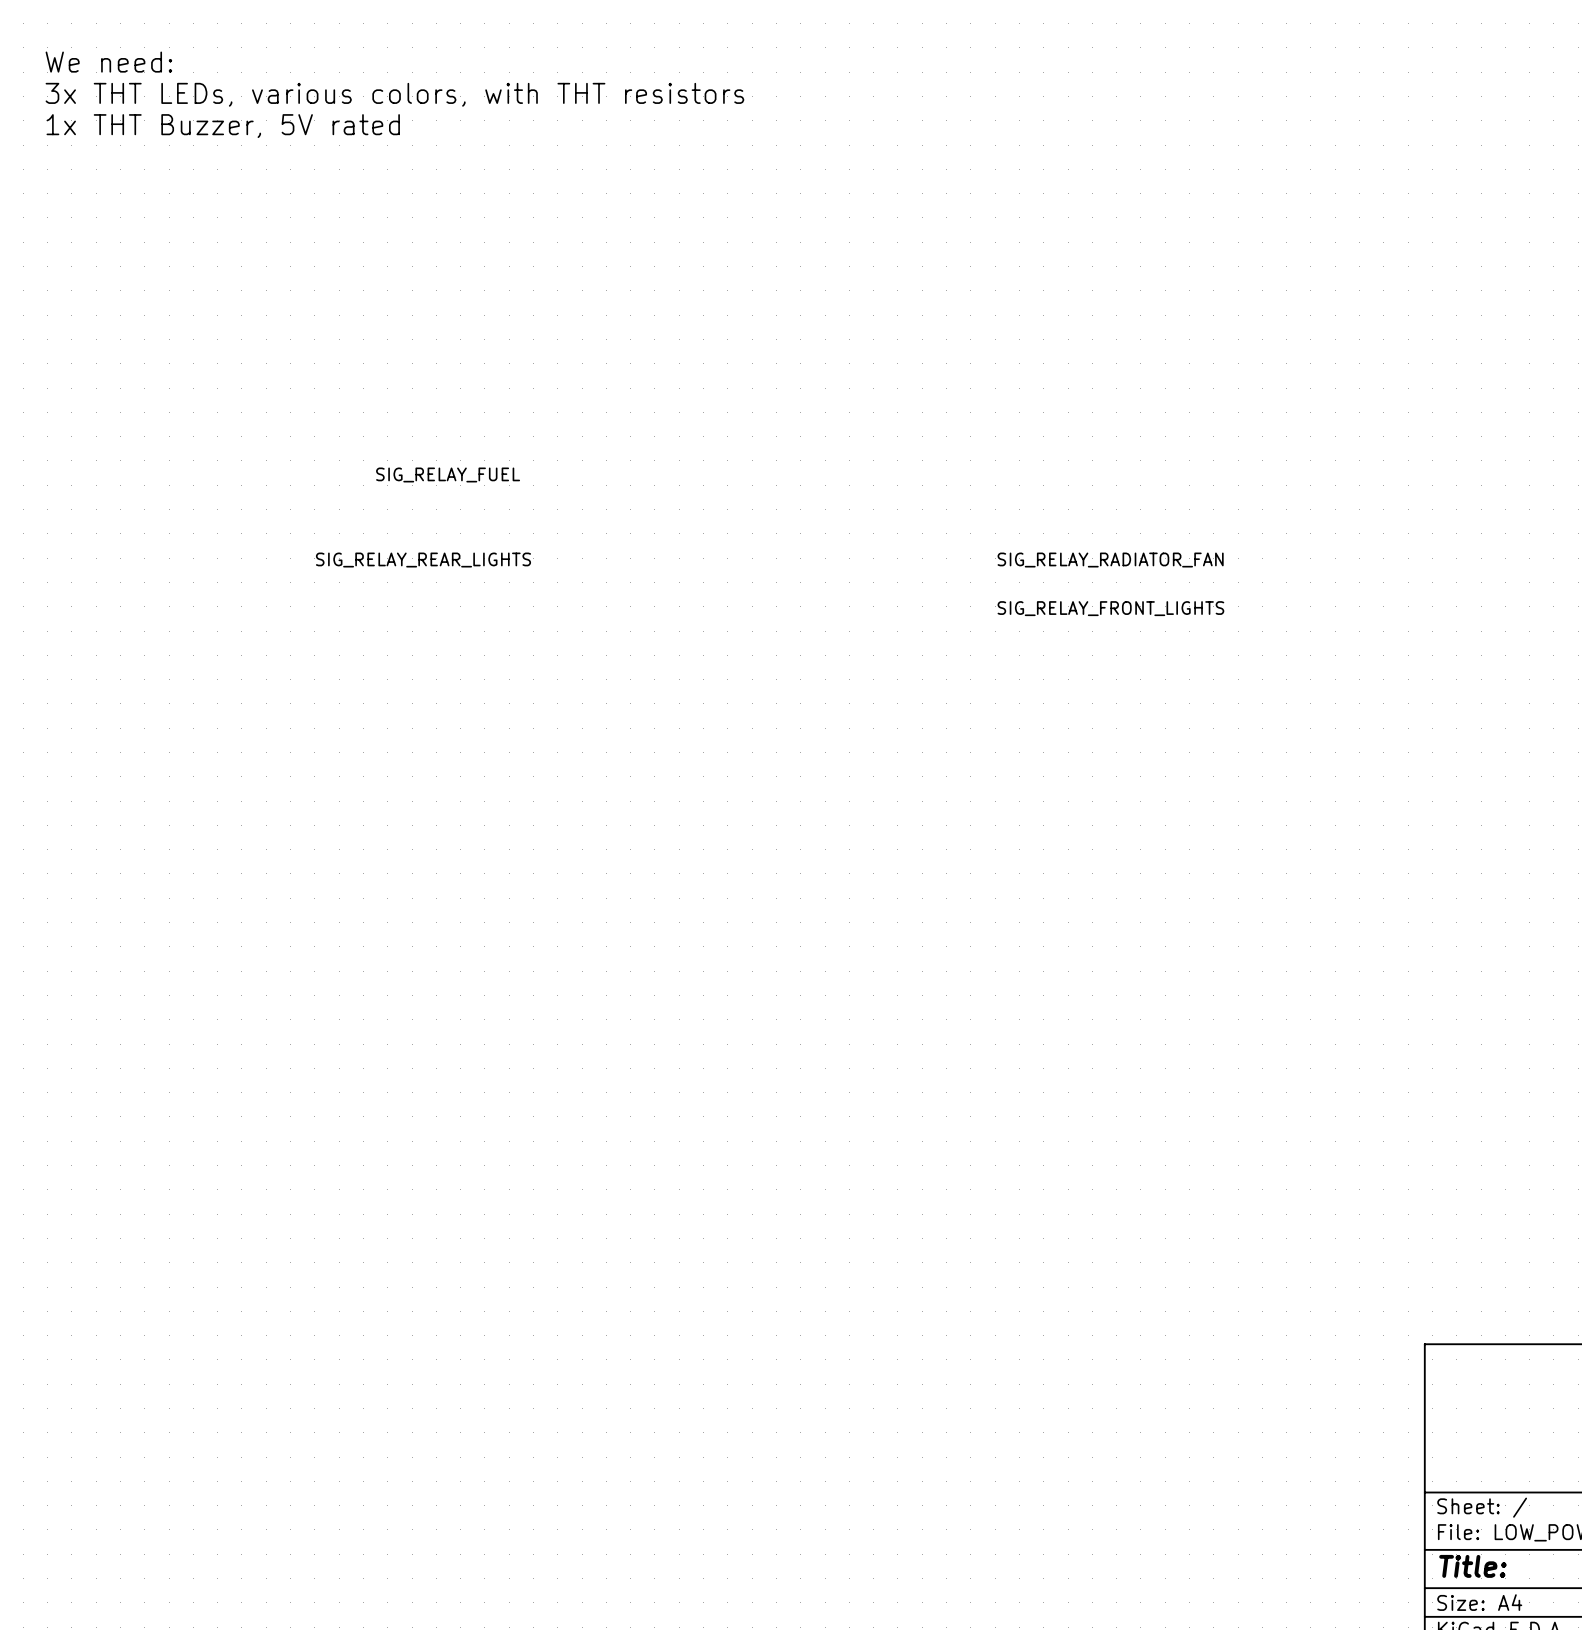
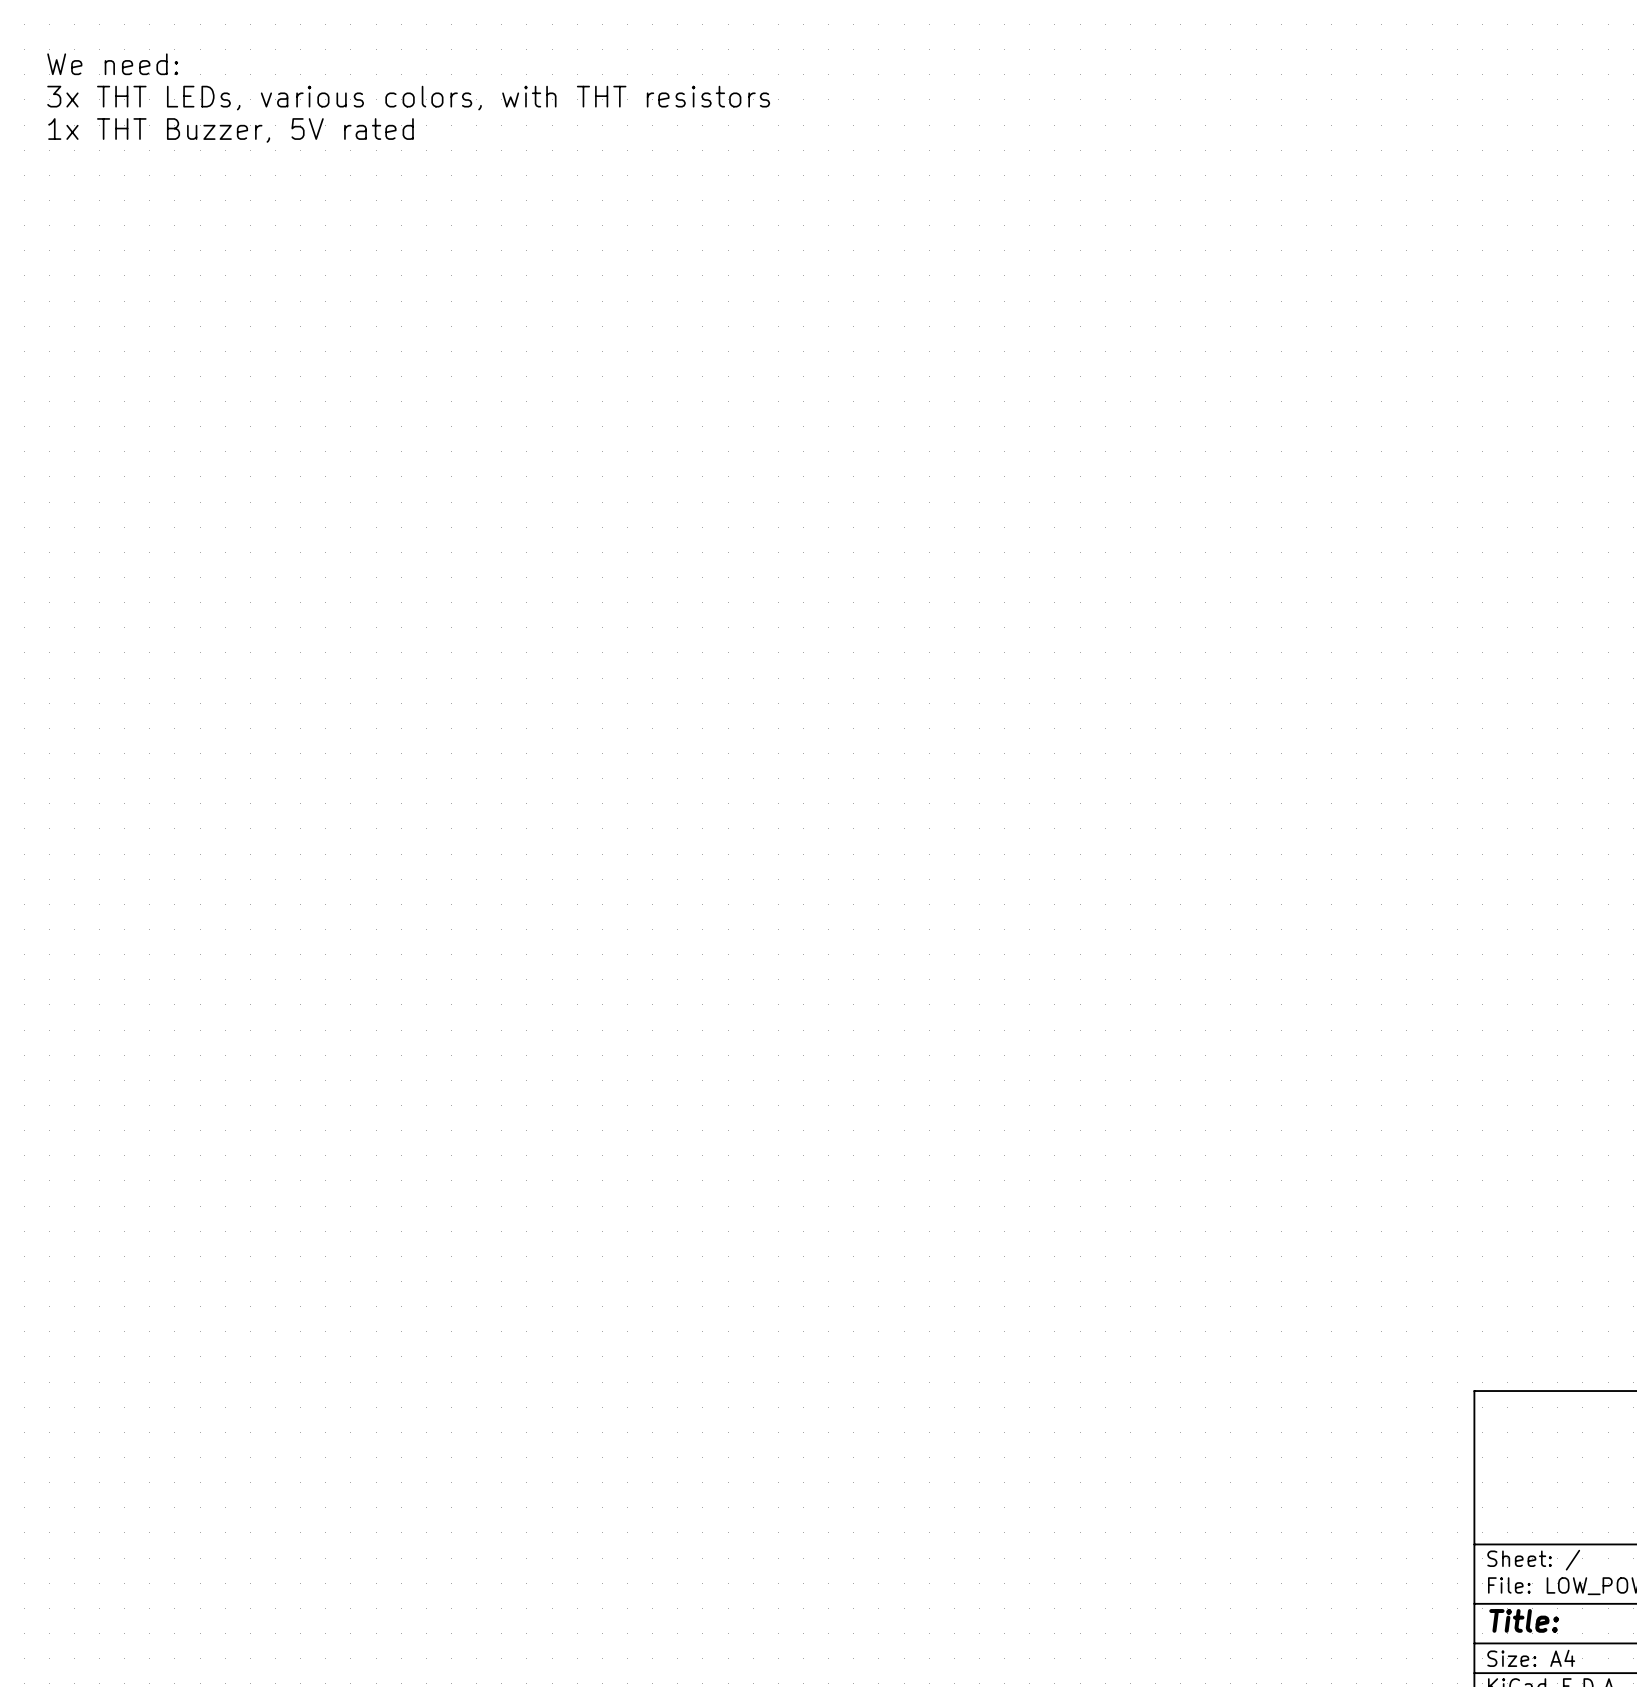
label: SIG_RELAY_FUEL (448, 474) -> none
label: SIG_RELAY_REAR_LIGHTS (423, 560) -> none
label: SIG_RELAY_RADIATOR_FAN (1110, 560) -> none
label: SIG_RELAY_FRONT_LIGHTS (1110, 608) -> none

